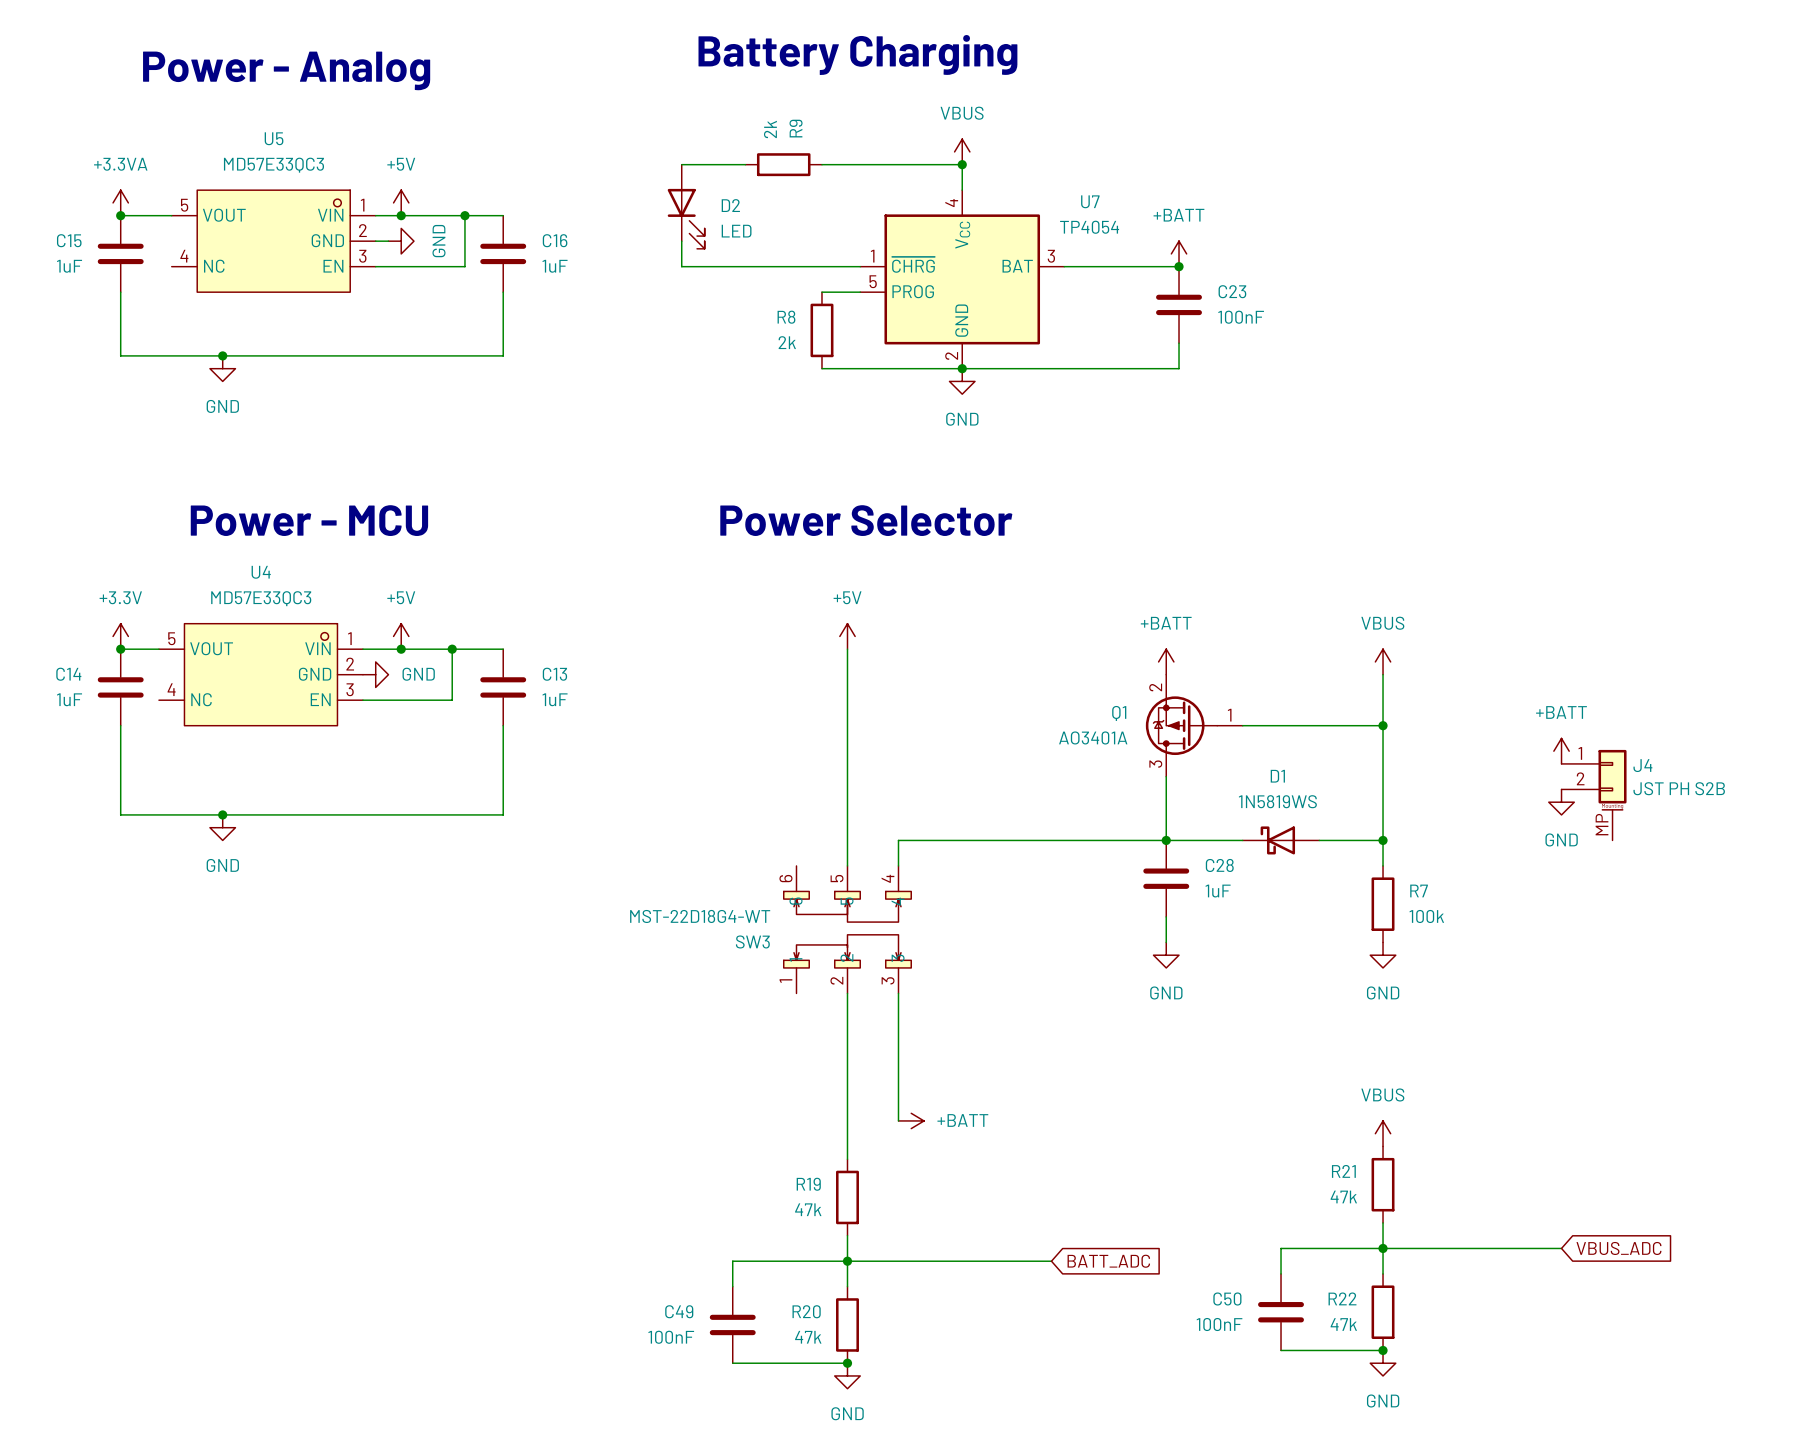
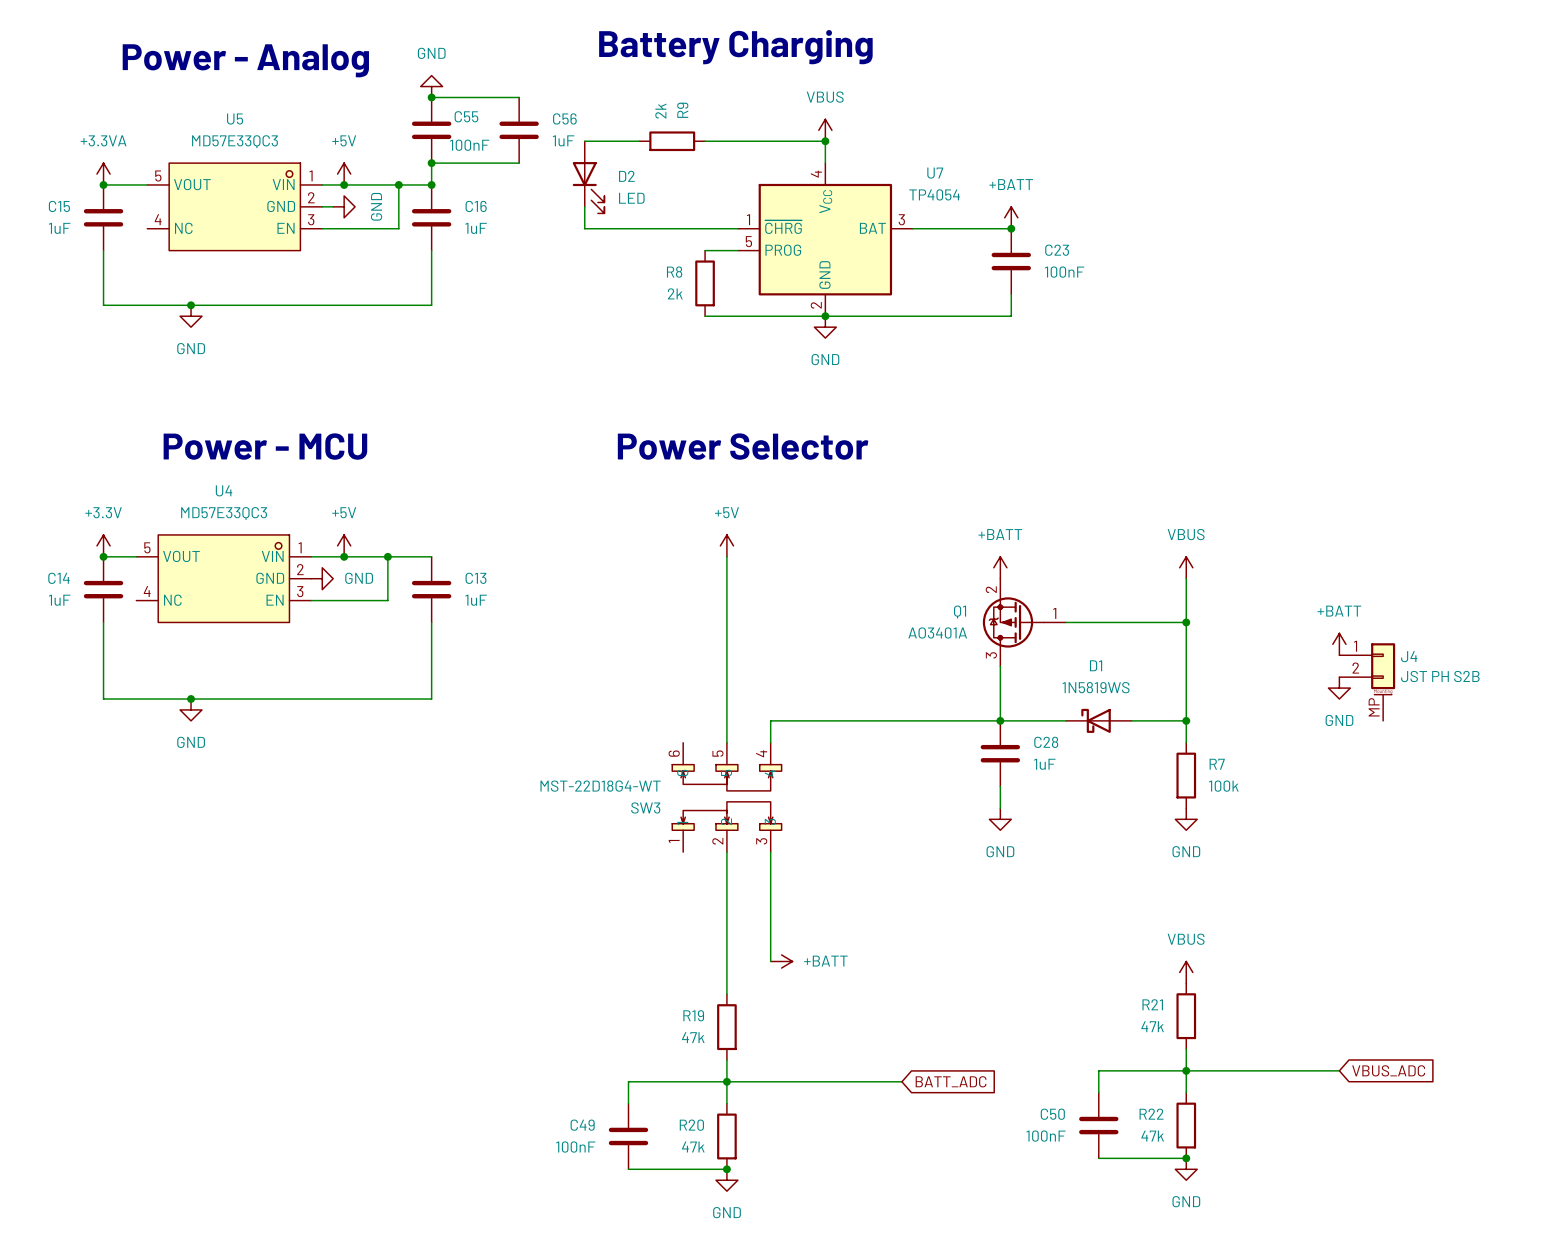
power symbol: none -> GND (431, 86)
wire: none -> (431, 97) (519, 97)
junction: none -> (431, 97)
C55: none -> 100nF (431, 130)
C56: none -> 1uF (519, 130)
junction: none -> (431, 163)
wire: none -> (519, 163) (431, 163) (431, 184)
junction: none -> (431, 184)

